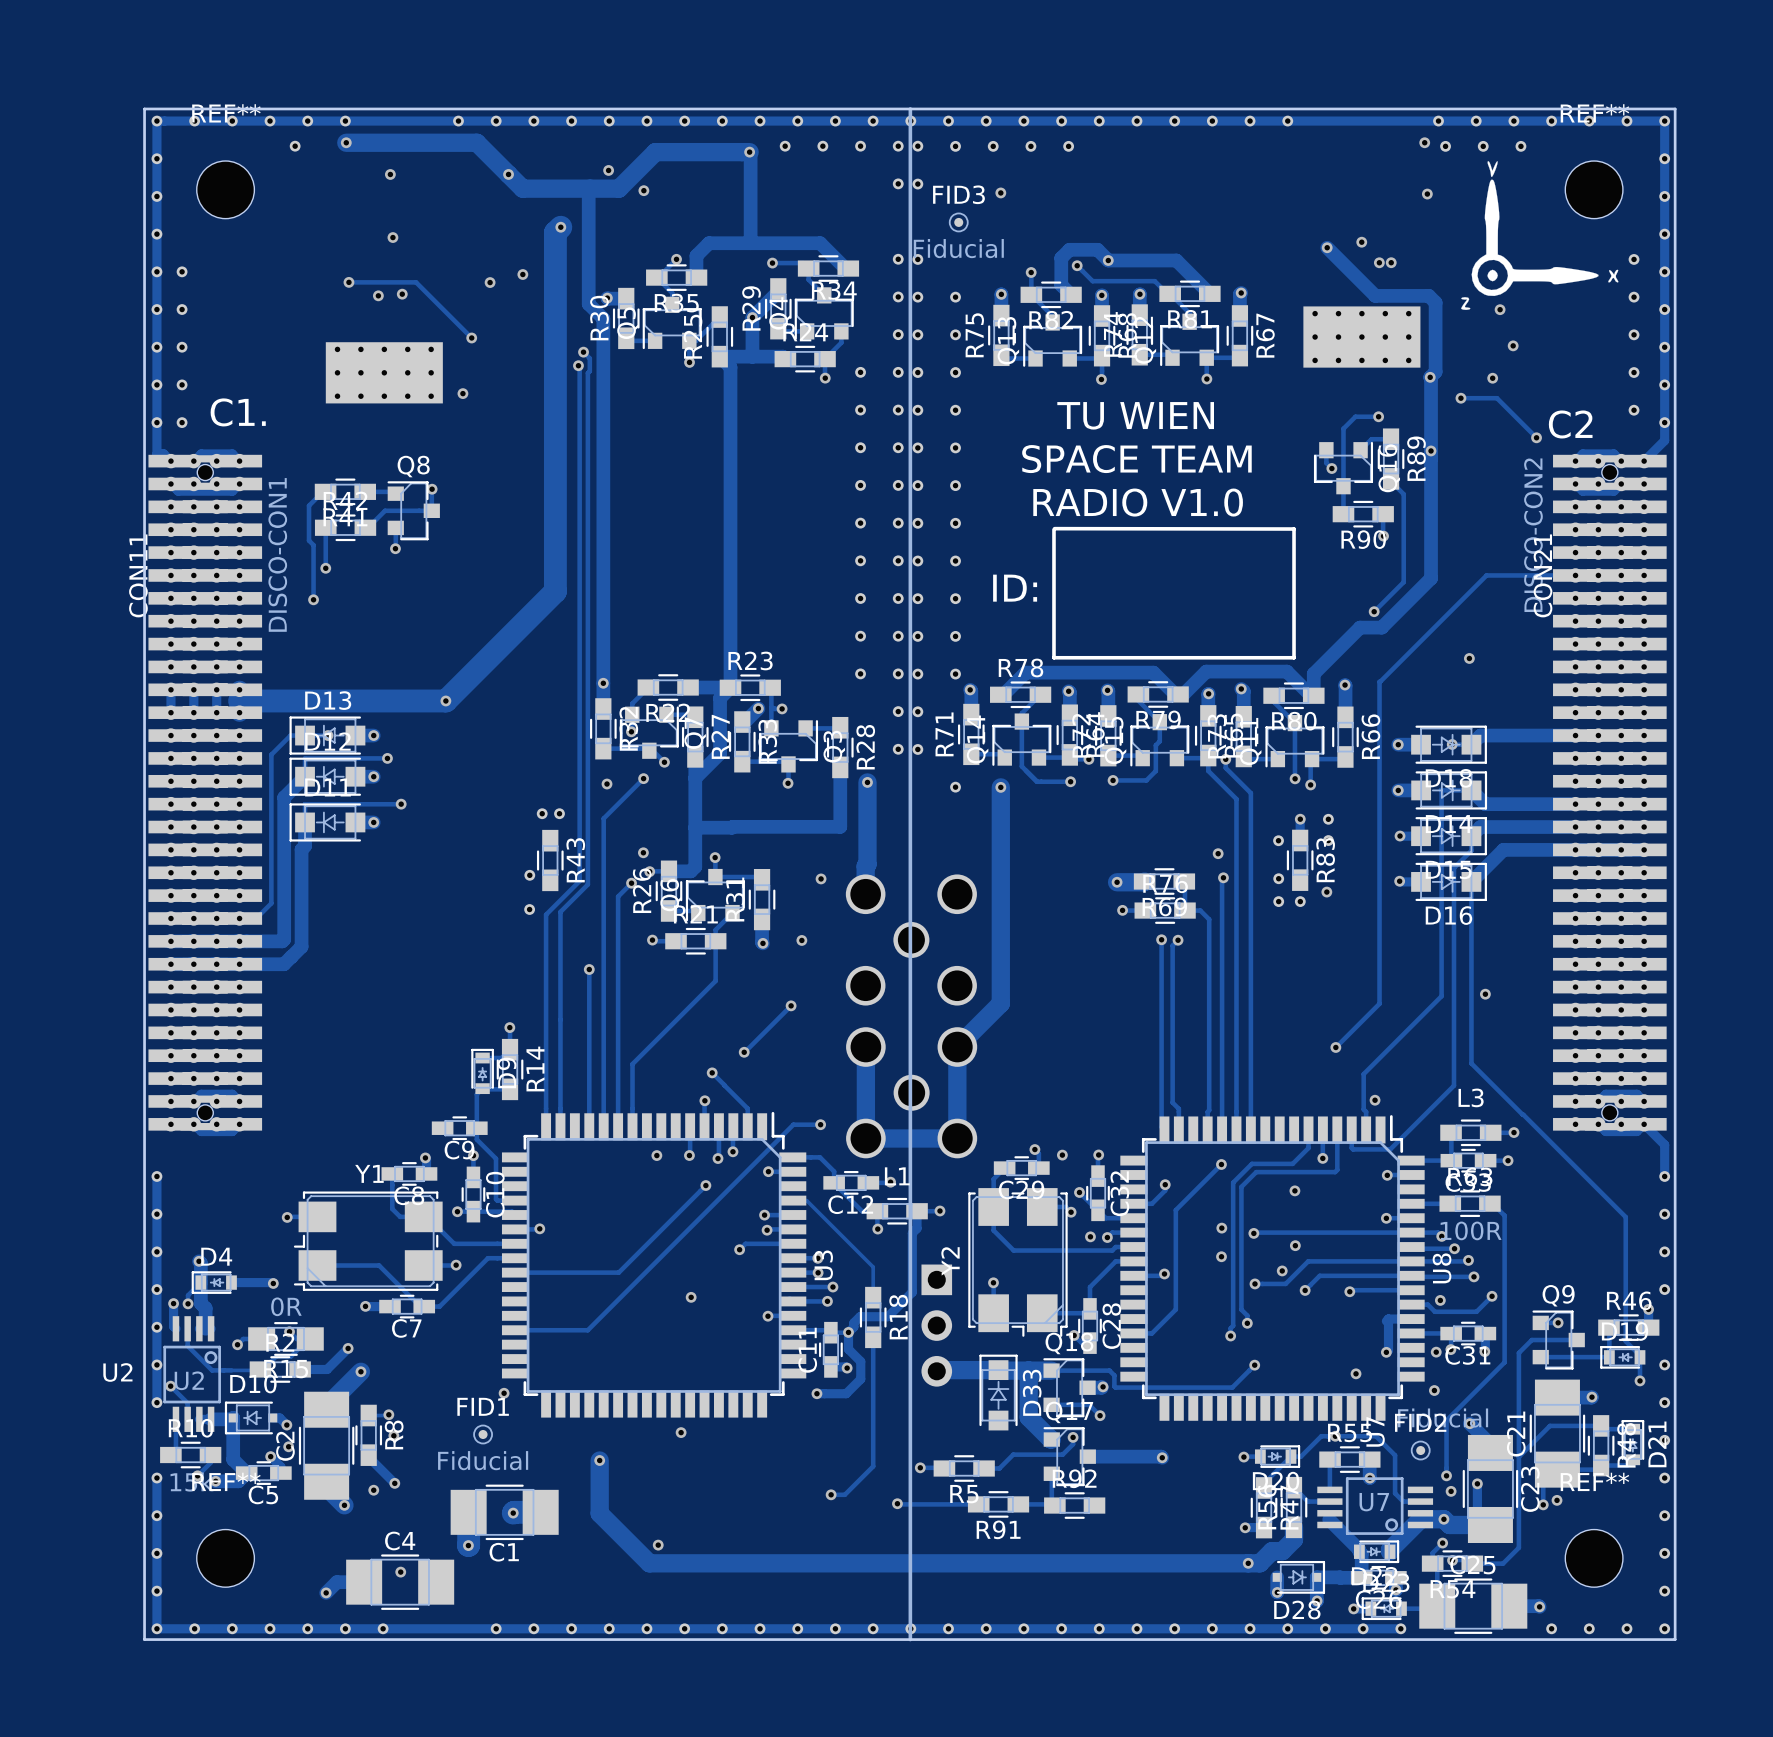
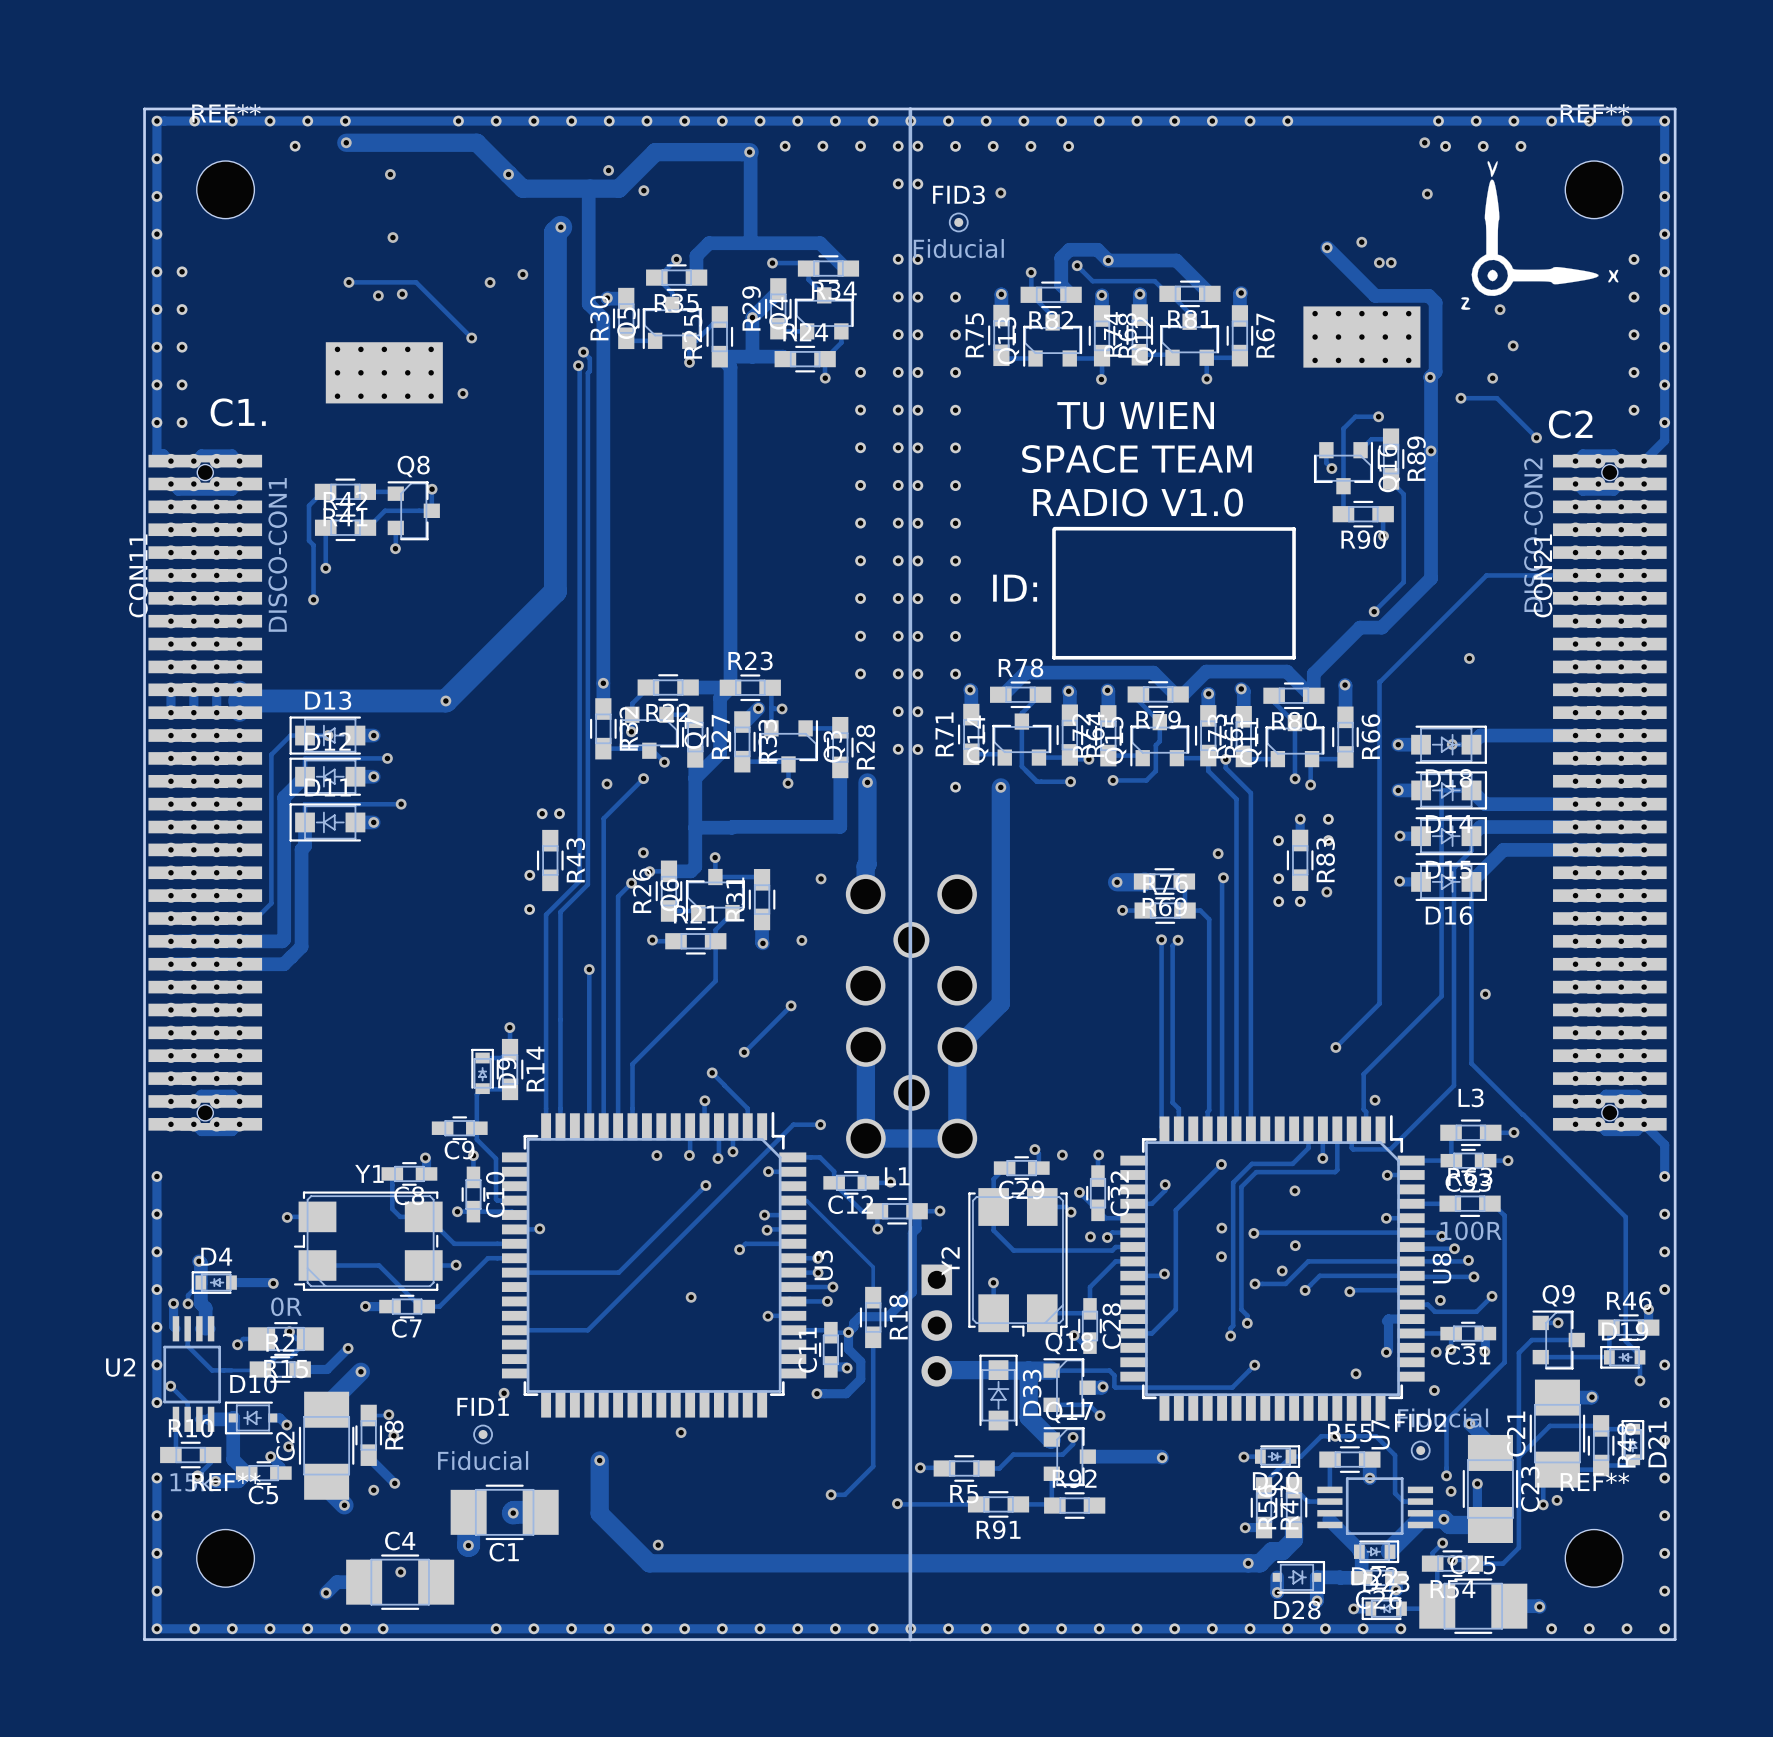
U2 footprint: [163, 1316, 221, 1432] -> [163, 1316, 221, 1432]
U7 footprint: [1317, 1477, 1434, 1535] -> [1317, 1477, 1434, 1535]

